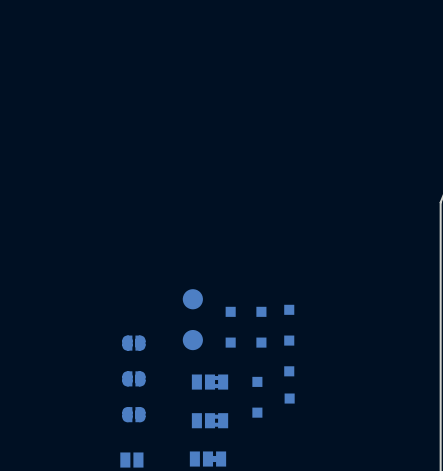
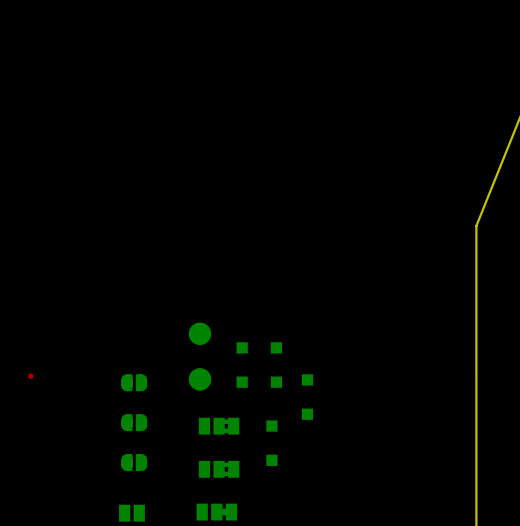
part: (289, 309) -> none
part: none -> (30, 376)
part: (289, 398) -> none

